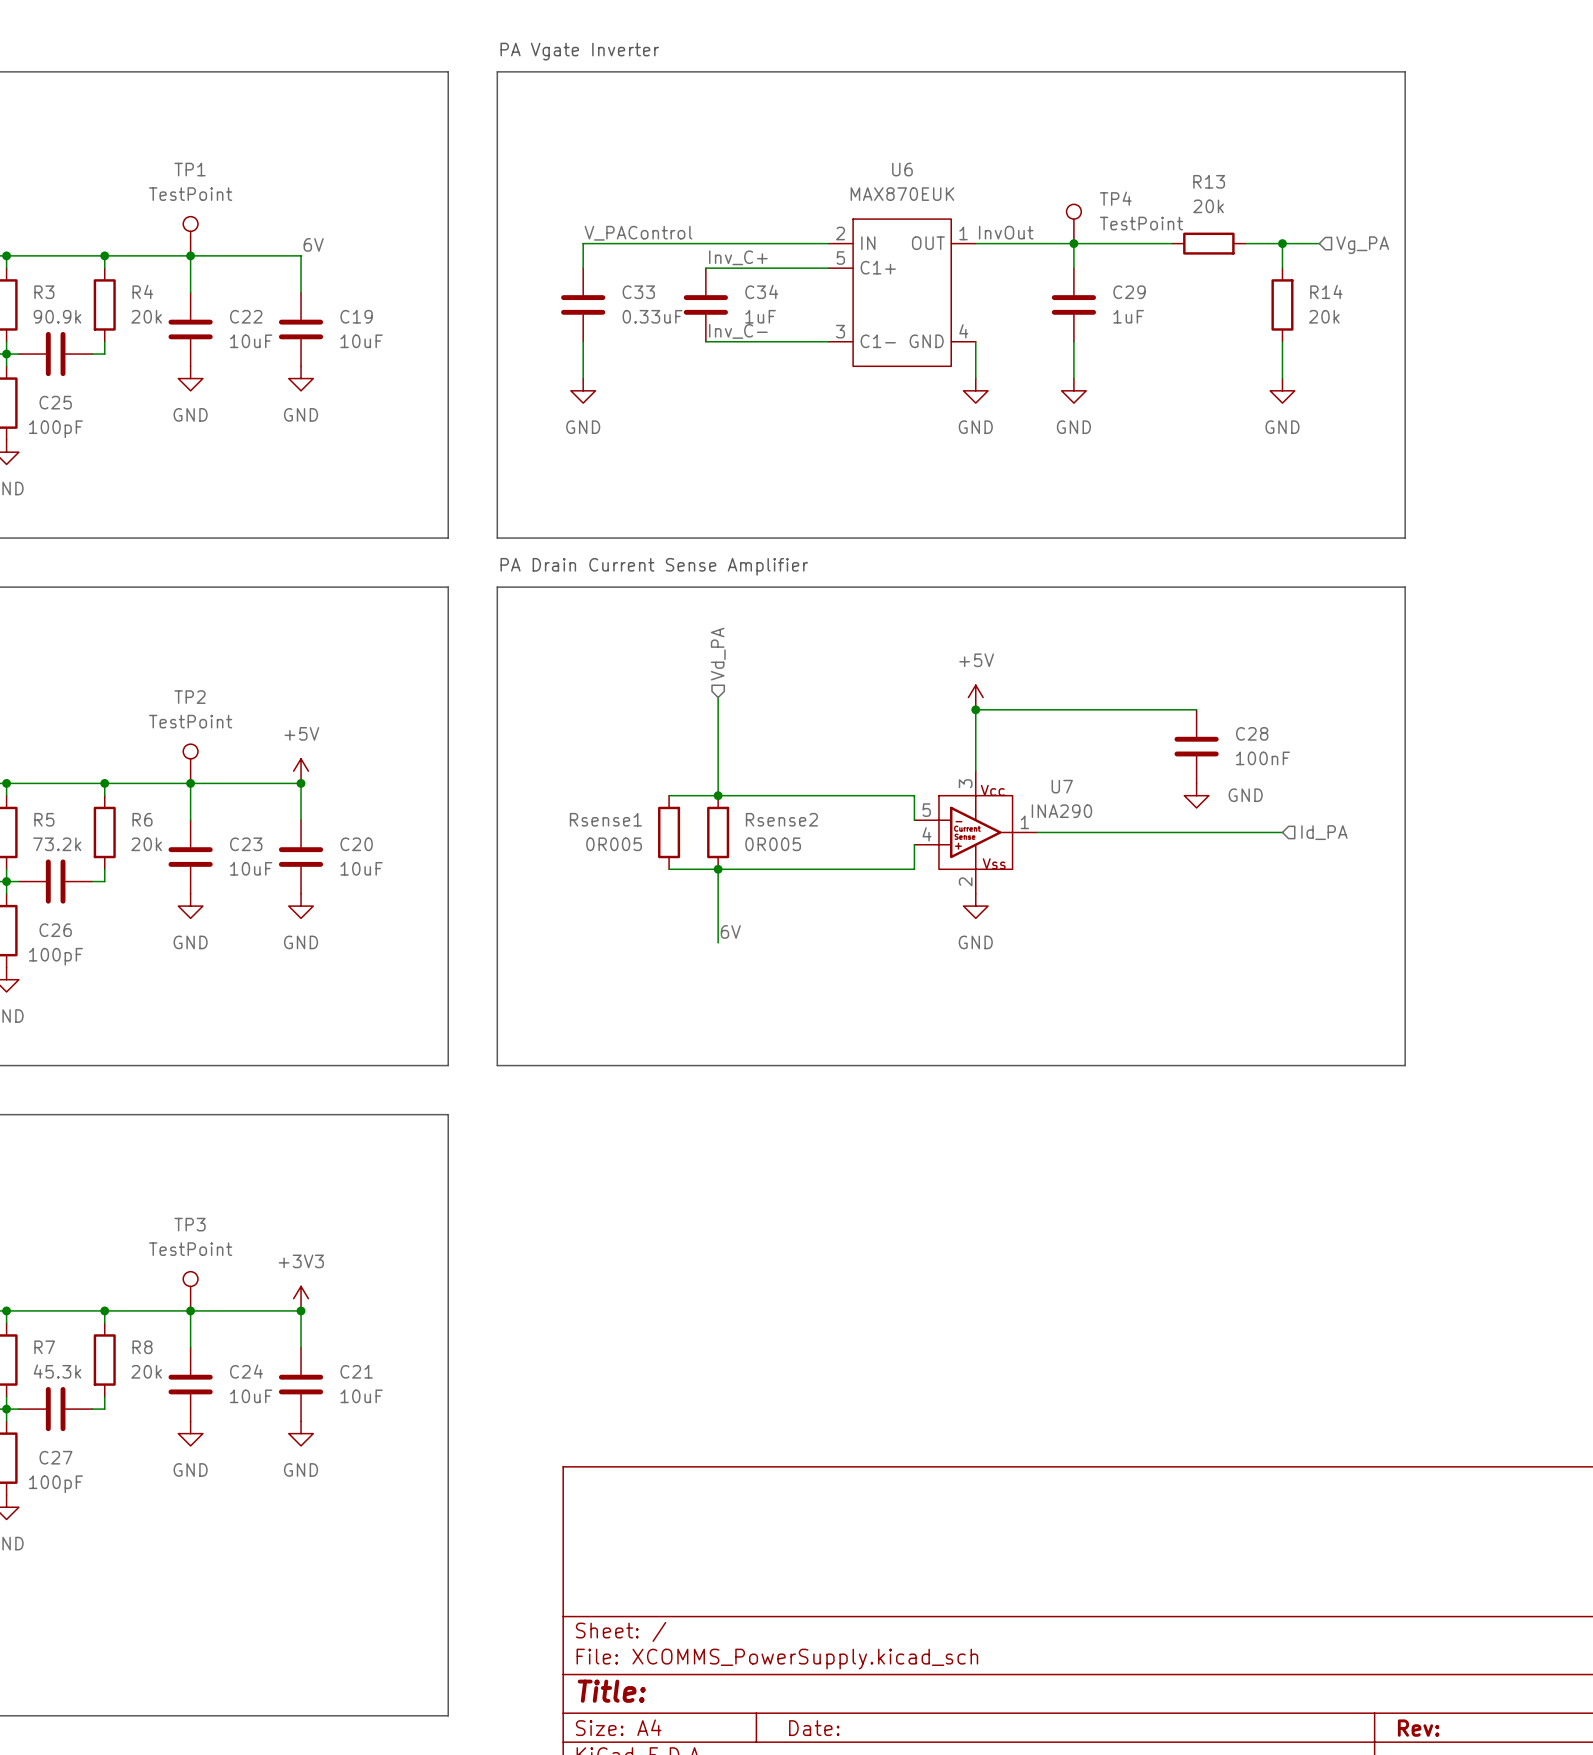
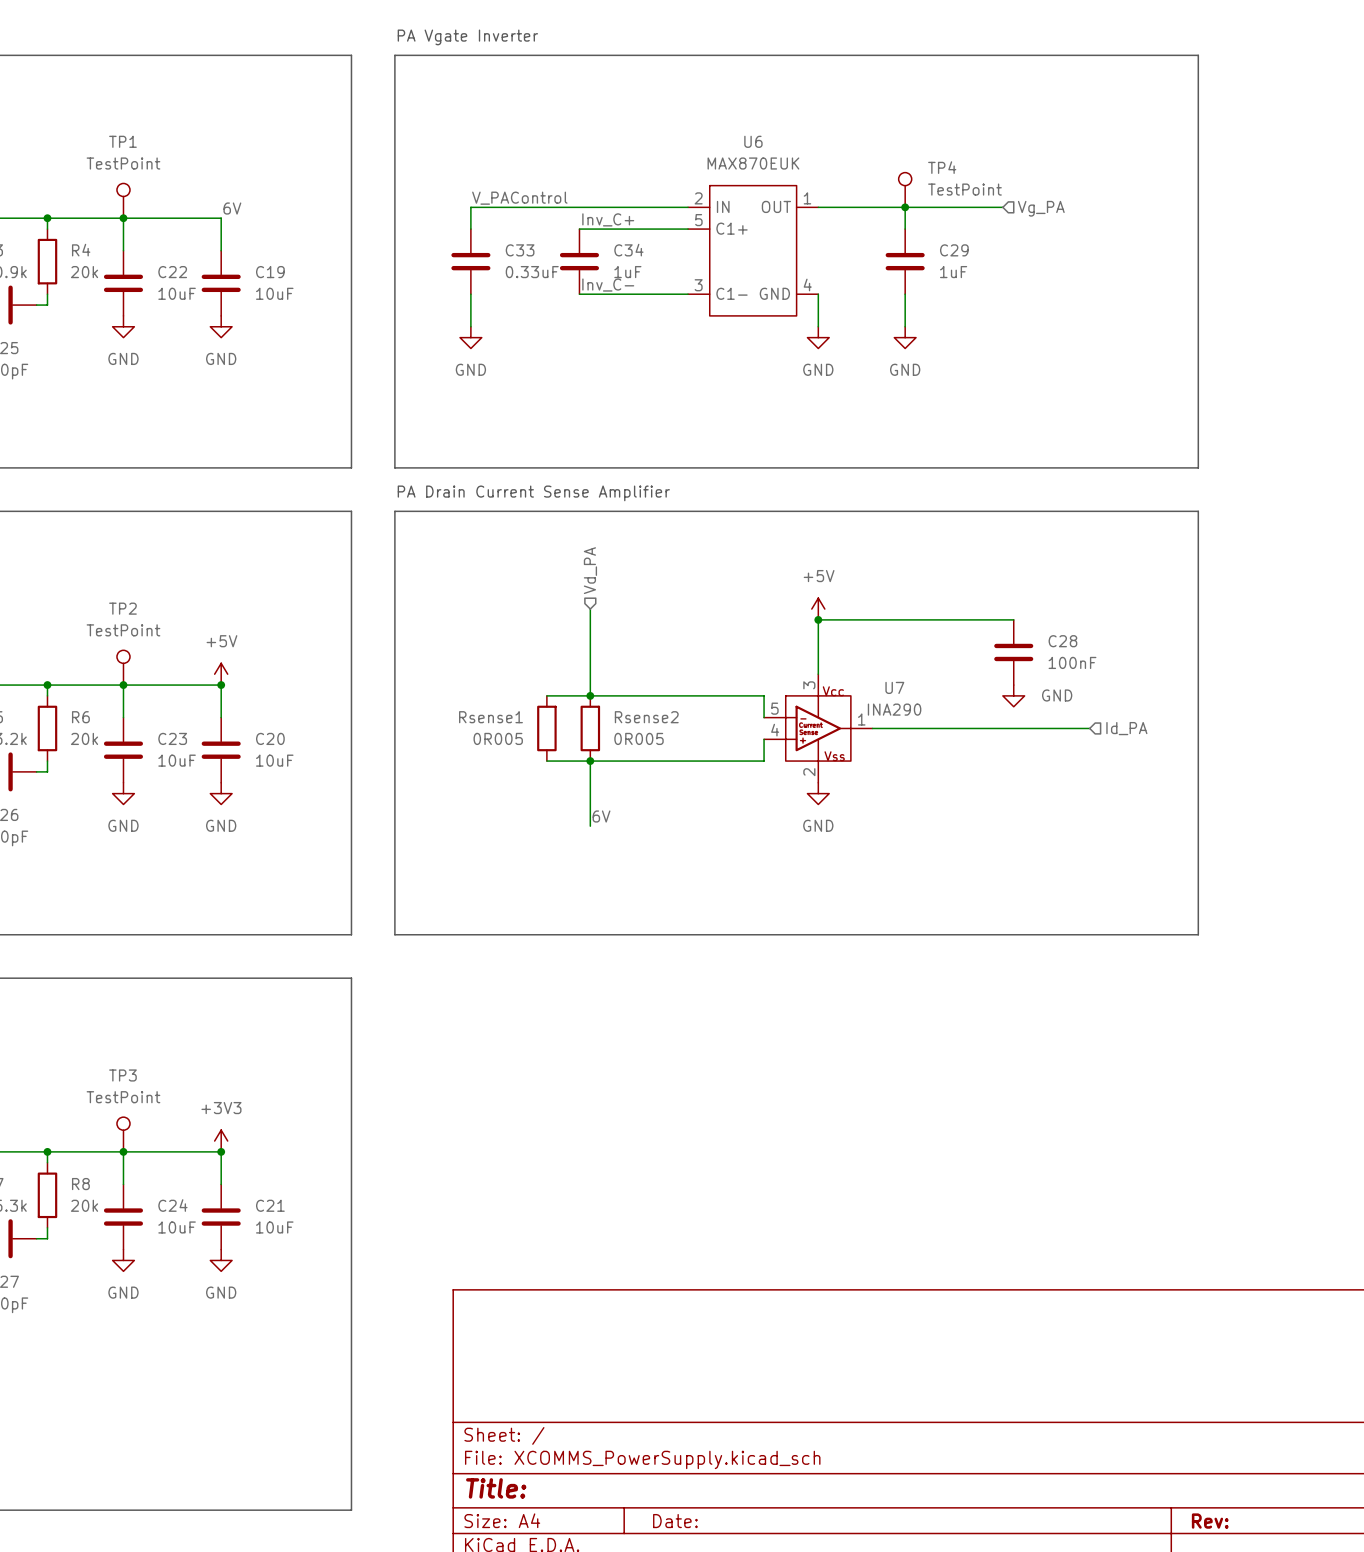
label: InvOut (1006, 232) -> none
R13: 20k (1208, 243) -> none
wire: (1245, 243) (1319, 243) -> none
wire: (1282, 243) (1282, 268) -> none
junction: (1282, 243) -> none
hierarchical label position: Vg_PA (1362, 245) -> Vg_PA (1041, 208)
R14: 20k (1282, 304) -> none
wire: (1282, 341) (1282, 378) -> none
power symbol: GND (1282, 390) -> none

